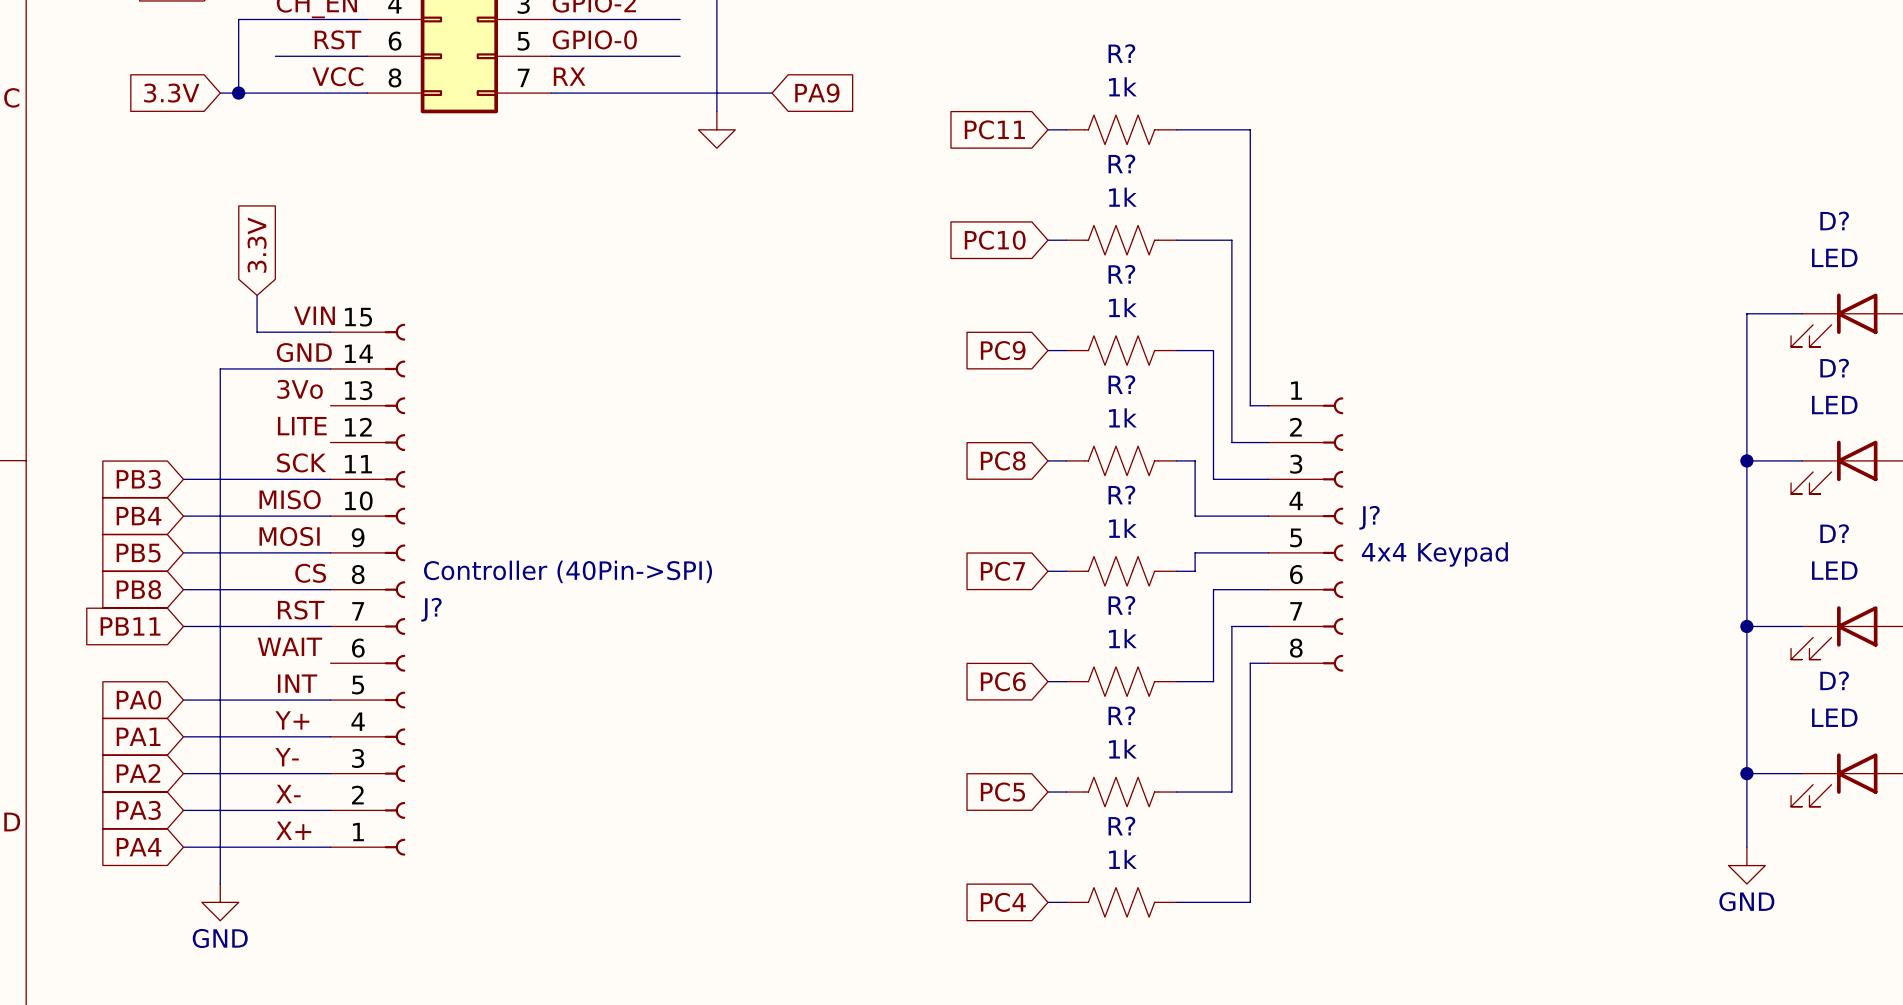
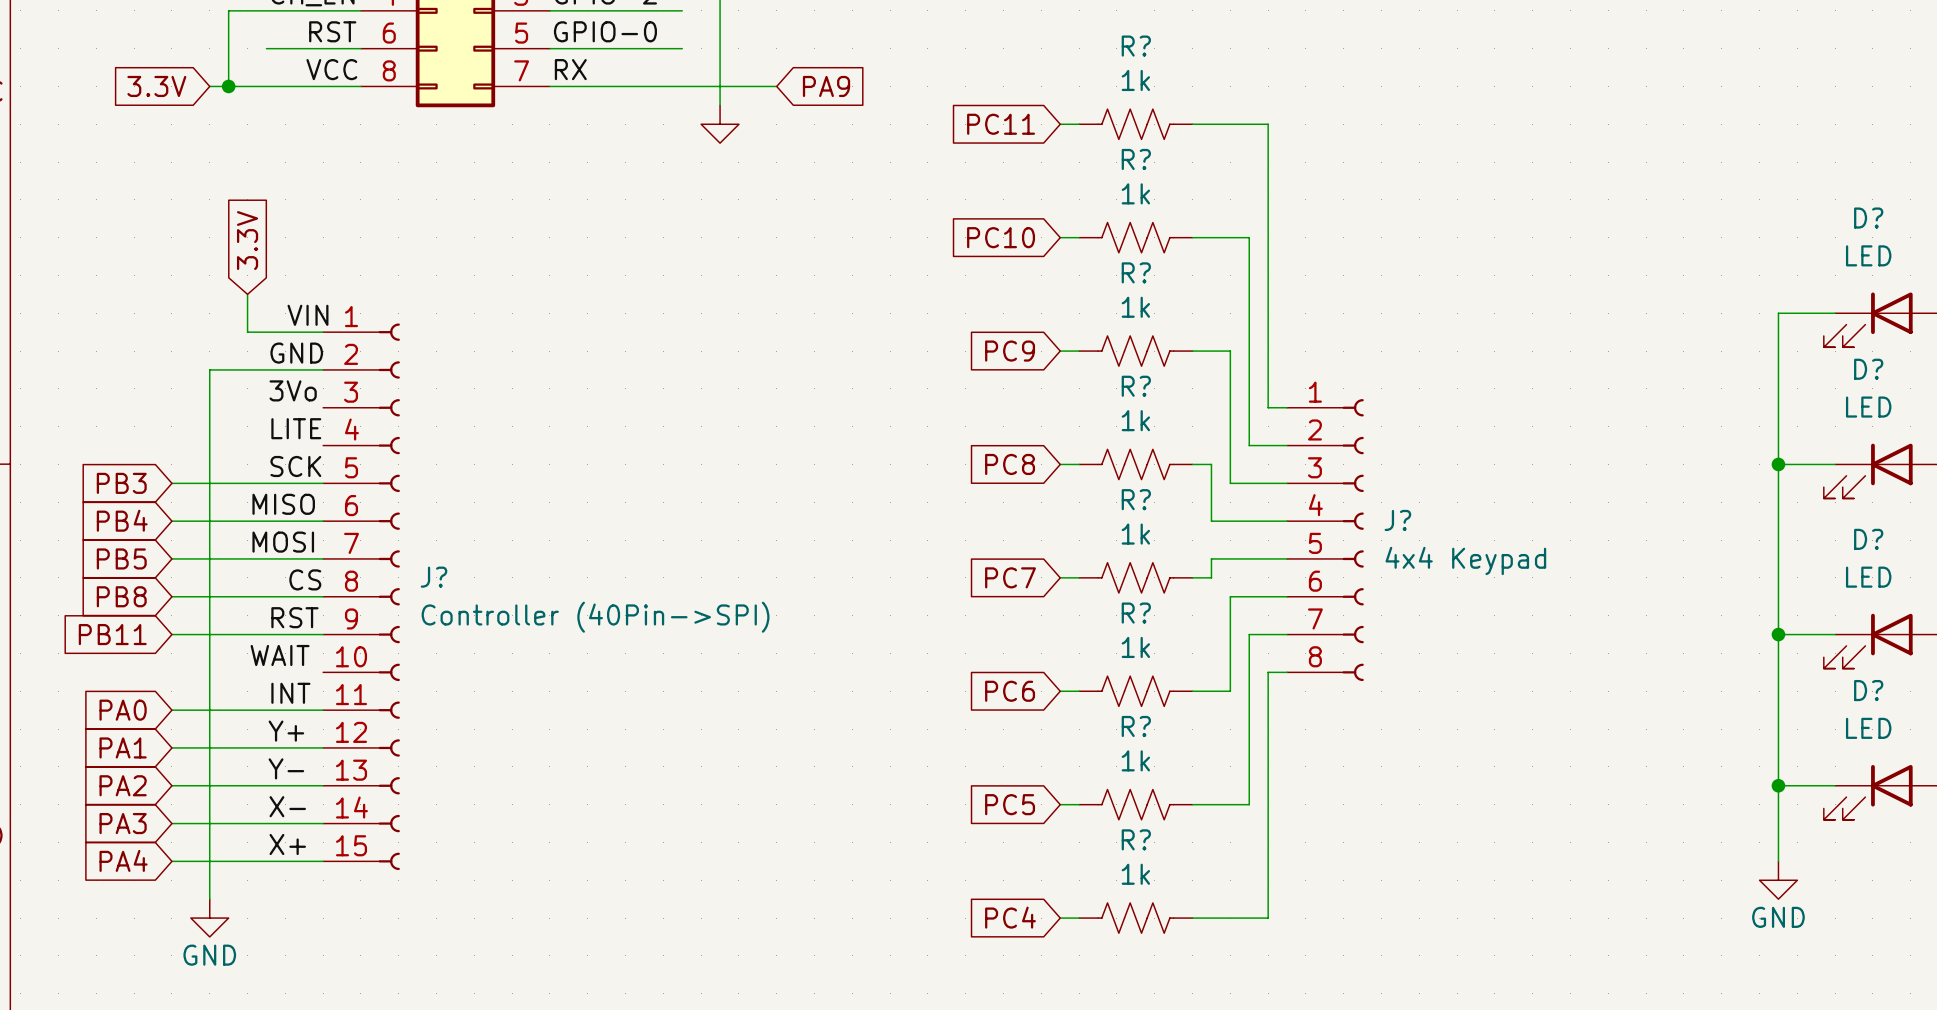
J? flip: as is (395, 589) -> up-down (389, 596)

